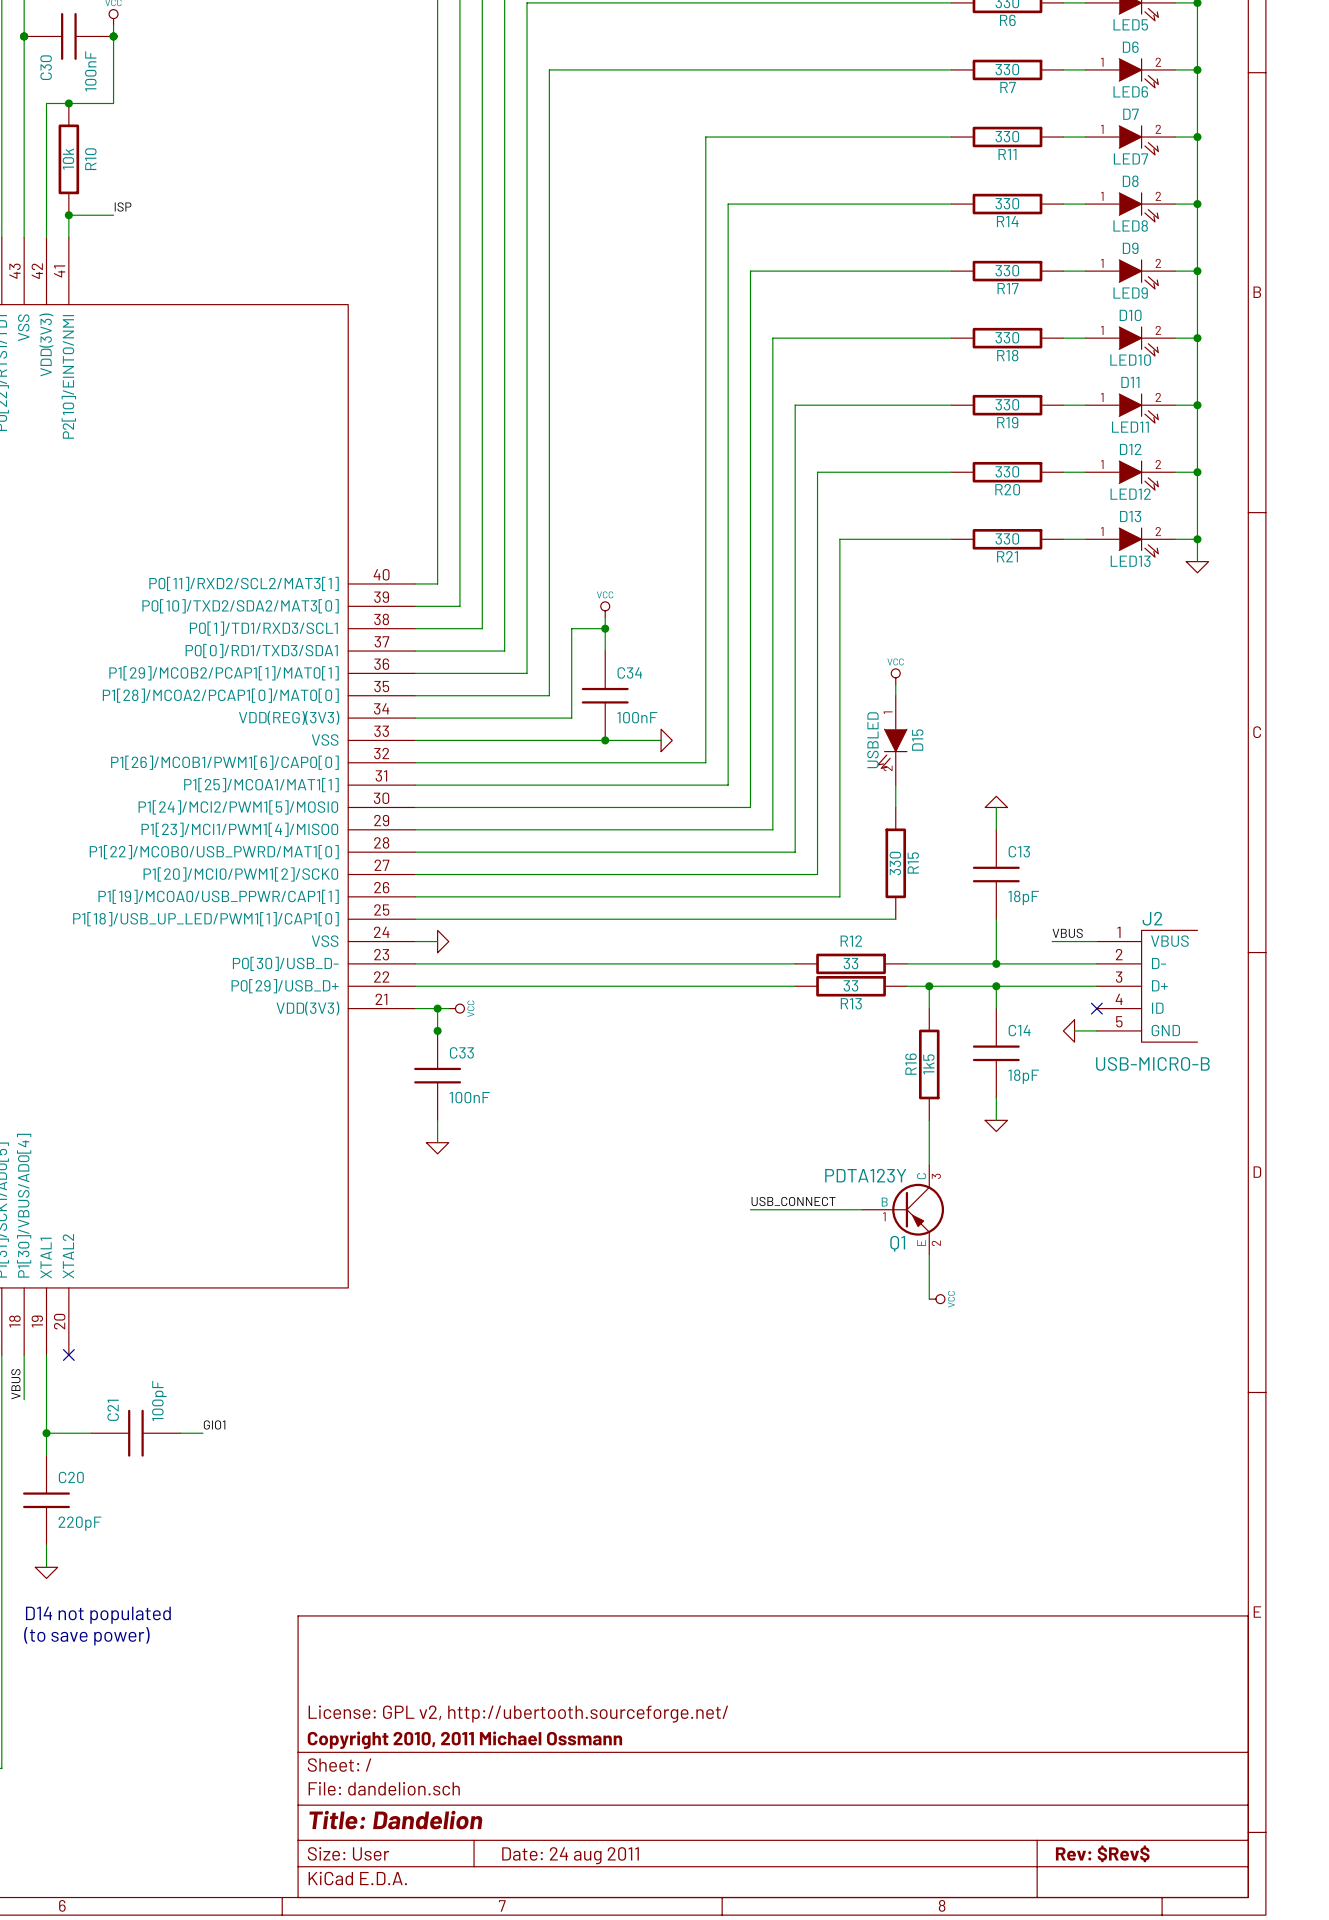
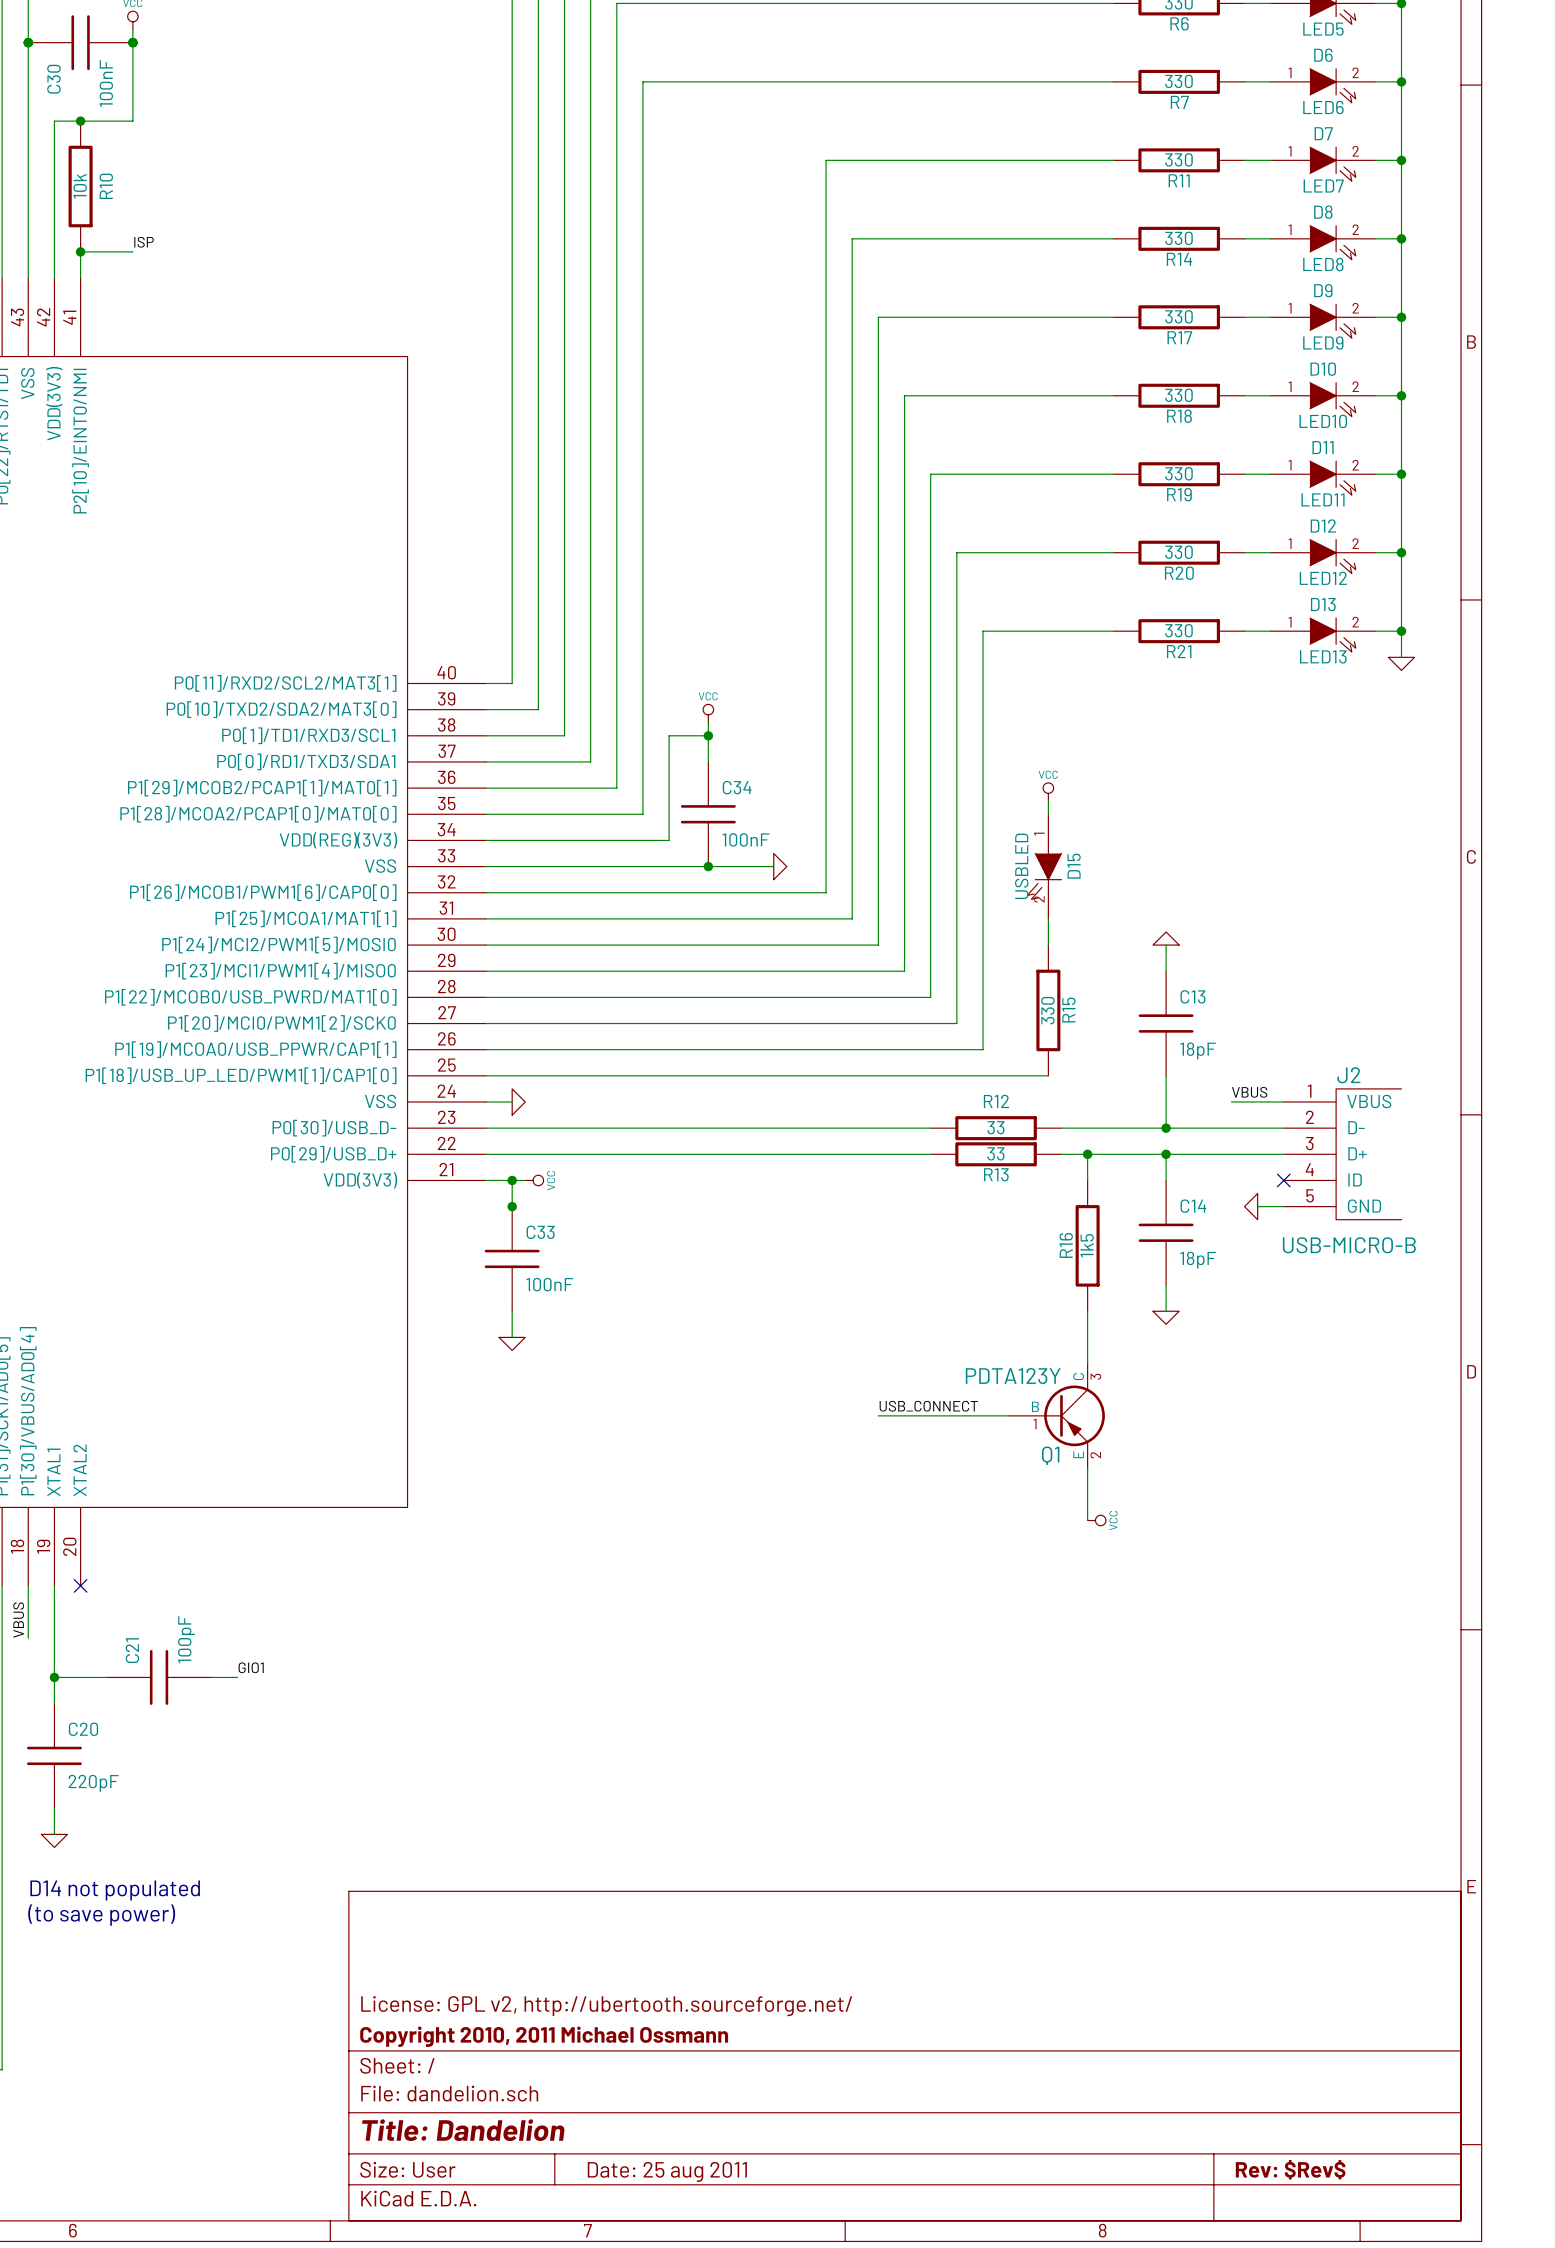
title block: Date: 24 aug 2011 (570, 1855) -> Date: 25 aug 2011 (667, 2171)

